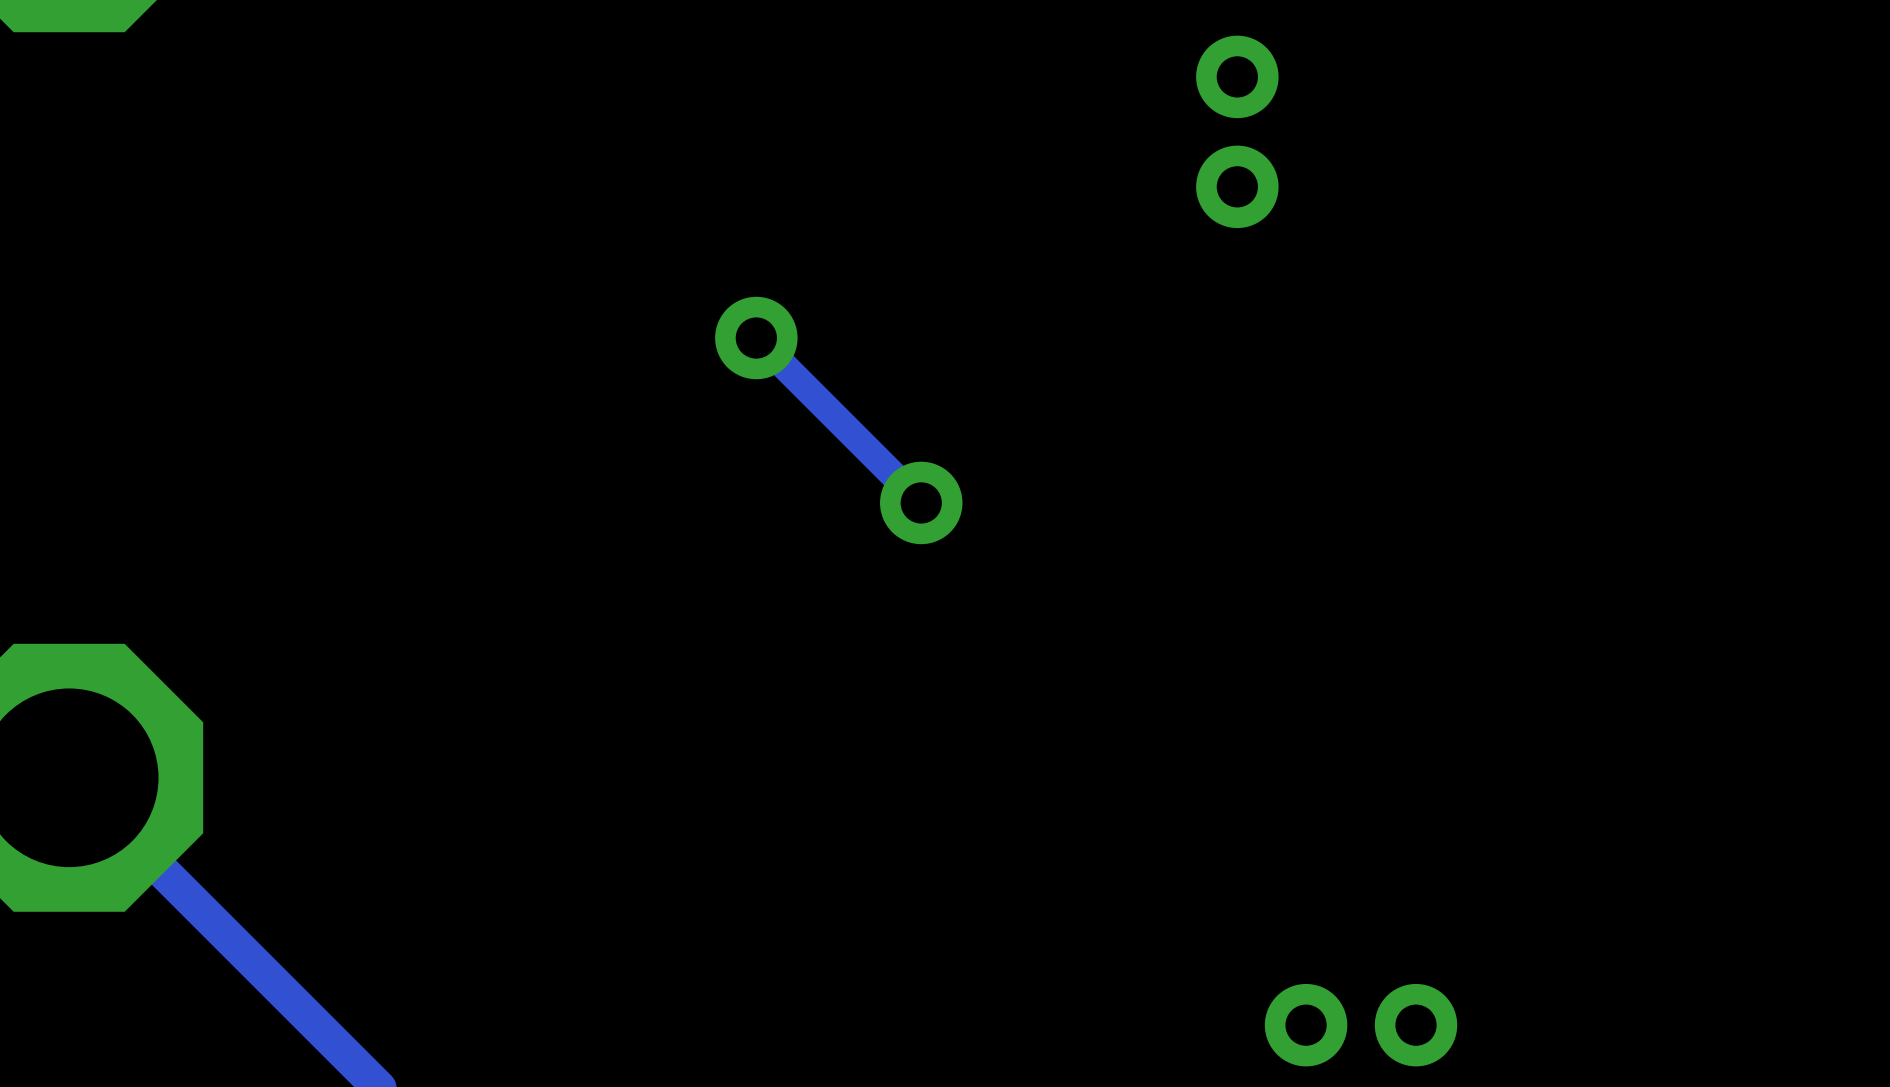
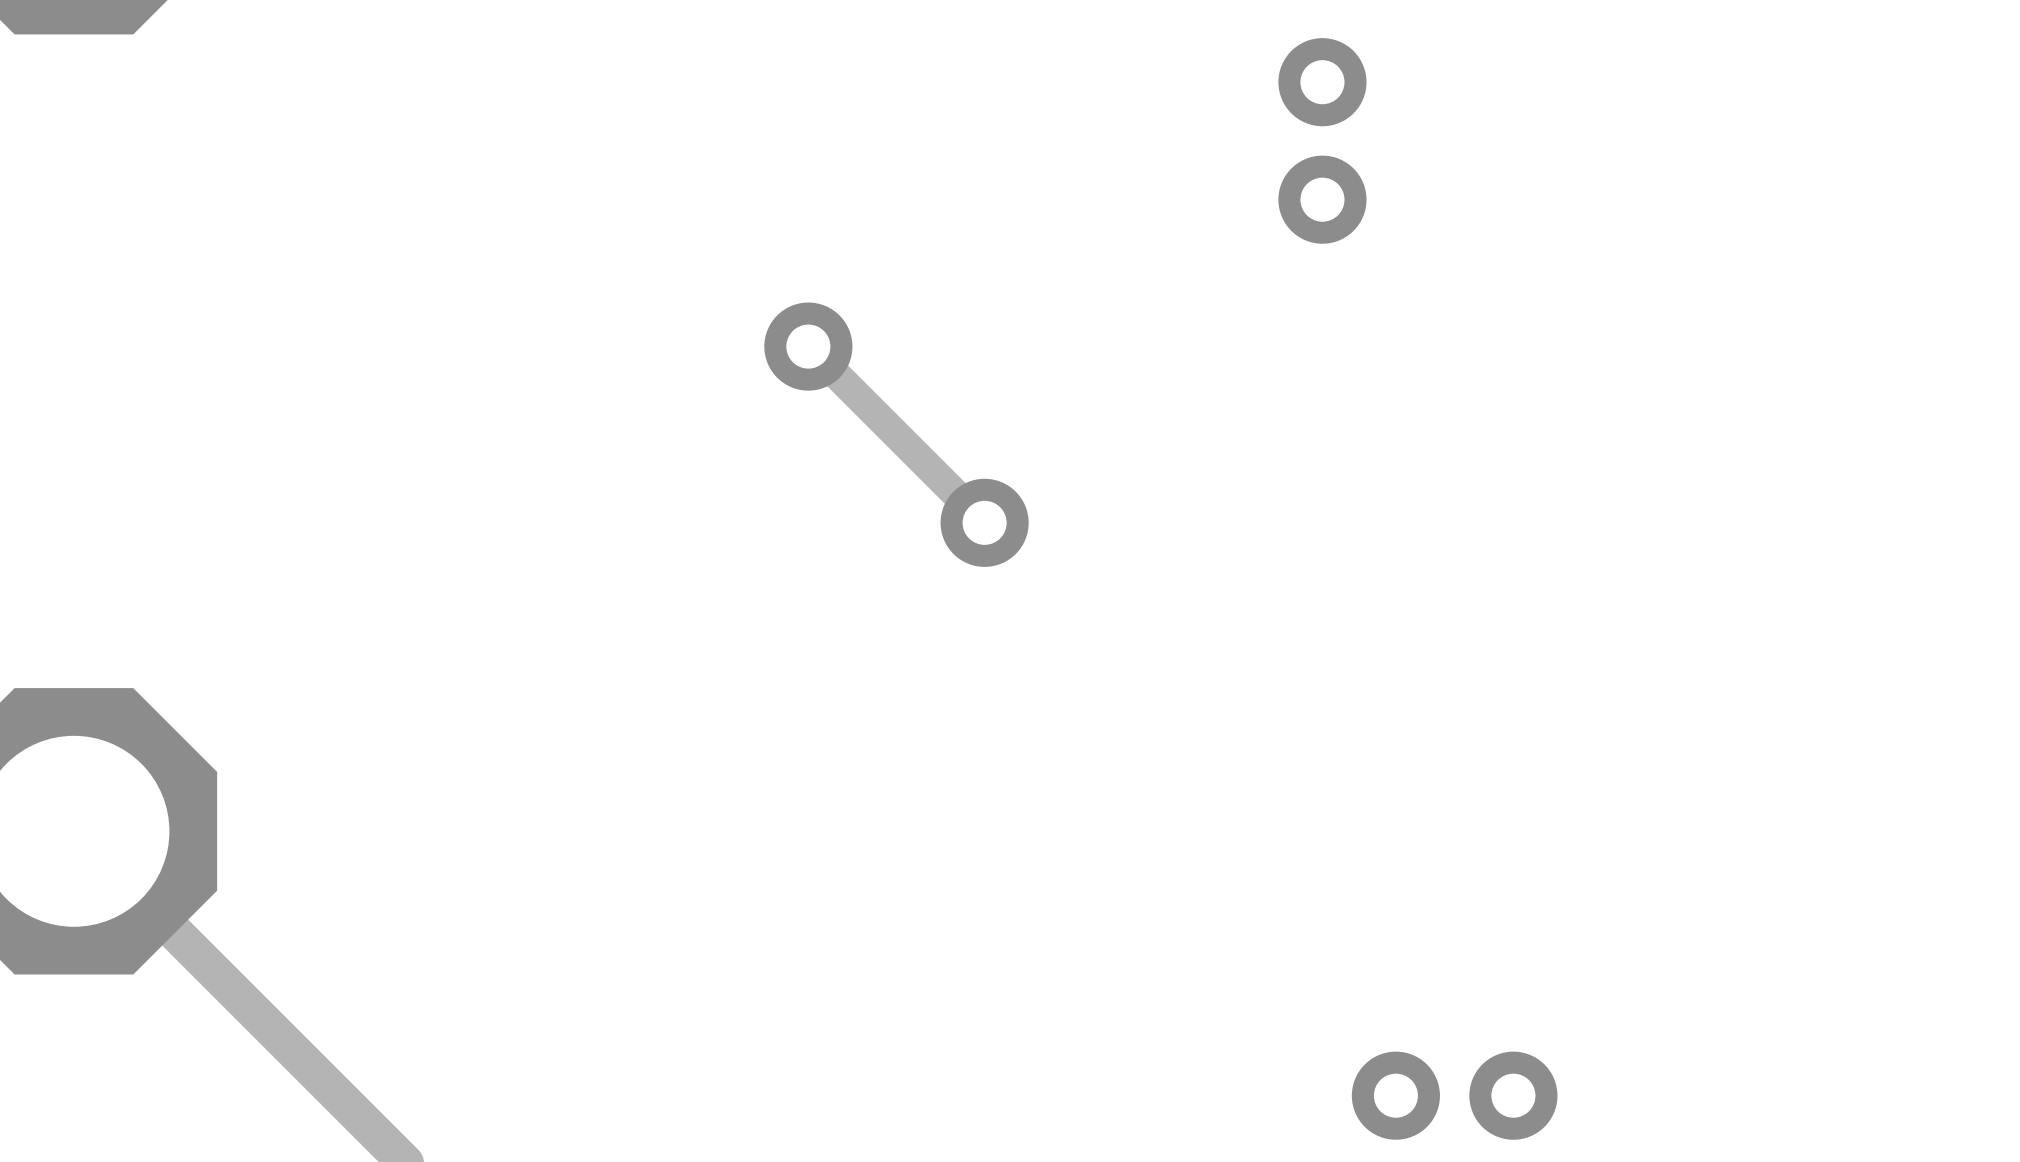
track: (756, 338) (921, 502) -> (808, 346) (984, 522)
via position: (756, 338) -> (808, 346)
via position: (921, 502) -> (984, 522)

